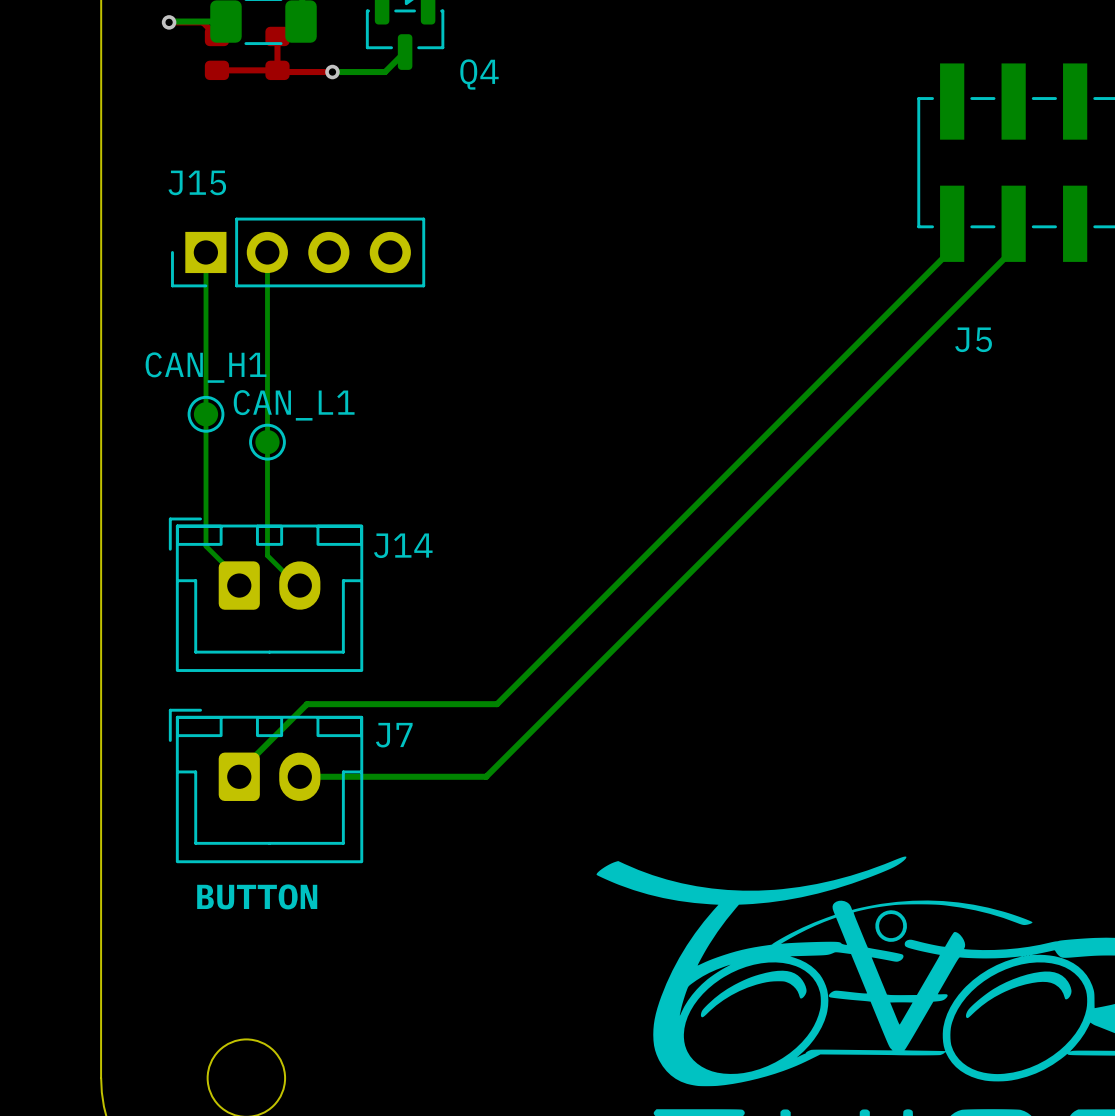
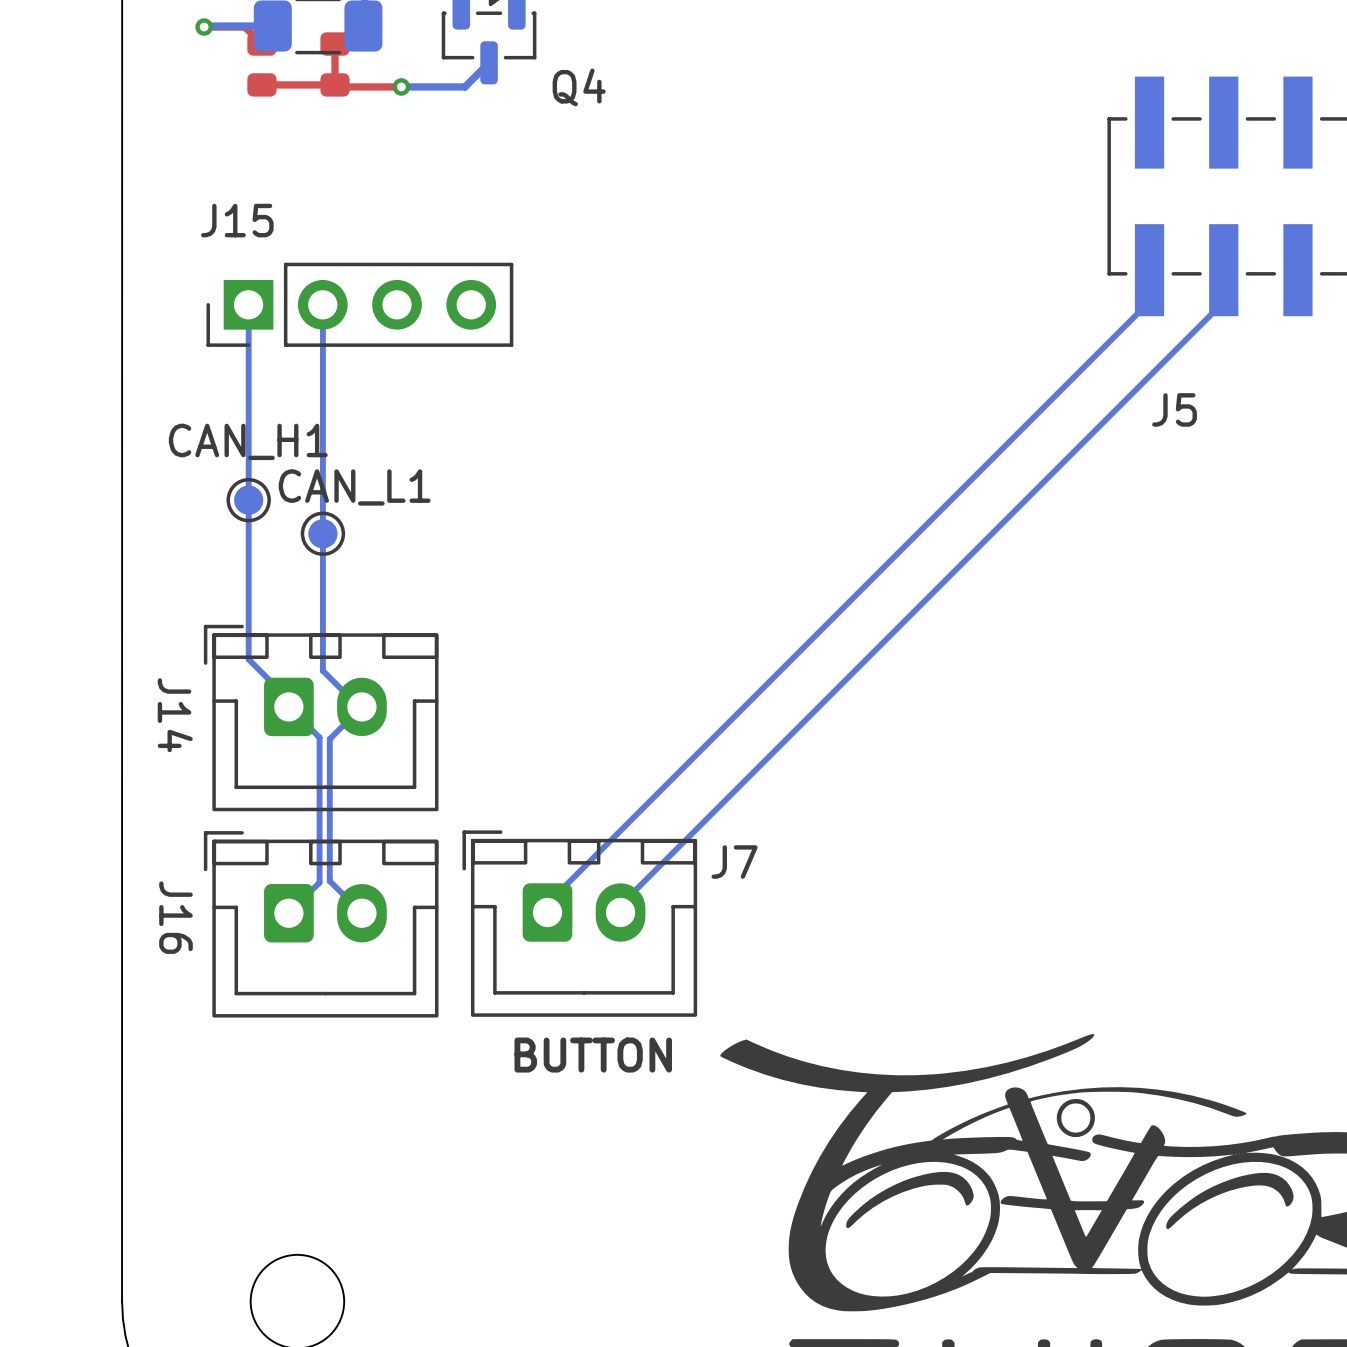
bottom track: (952, 249) (497, 704) (307, 704) (239, 771) (239, 776) -> (1149, 300) (547, 903) (547, 912)
bottom track: (1013, 249) (486, 776) (287, 776) -> (1223, 301) (620, 905) (620, 912)
J14 name rotation: 0° (403, 545) -> 90° clockwise (175, 715)
J14 name position: J14 (403, 545) -> J14 (175, 715)
bottom track: none -> (288, 706) (319, 737) (319, 882) (288, 913)
bottom track: none -> (361, 706) (329, 739) (329, 881) (361, 913)
J16: none -> (321, 924)
J7 position: (266, 785) -> (579, 923)
text position: BUTTON (257, 896) -> BUTTON (593, 1055)

